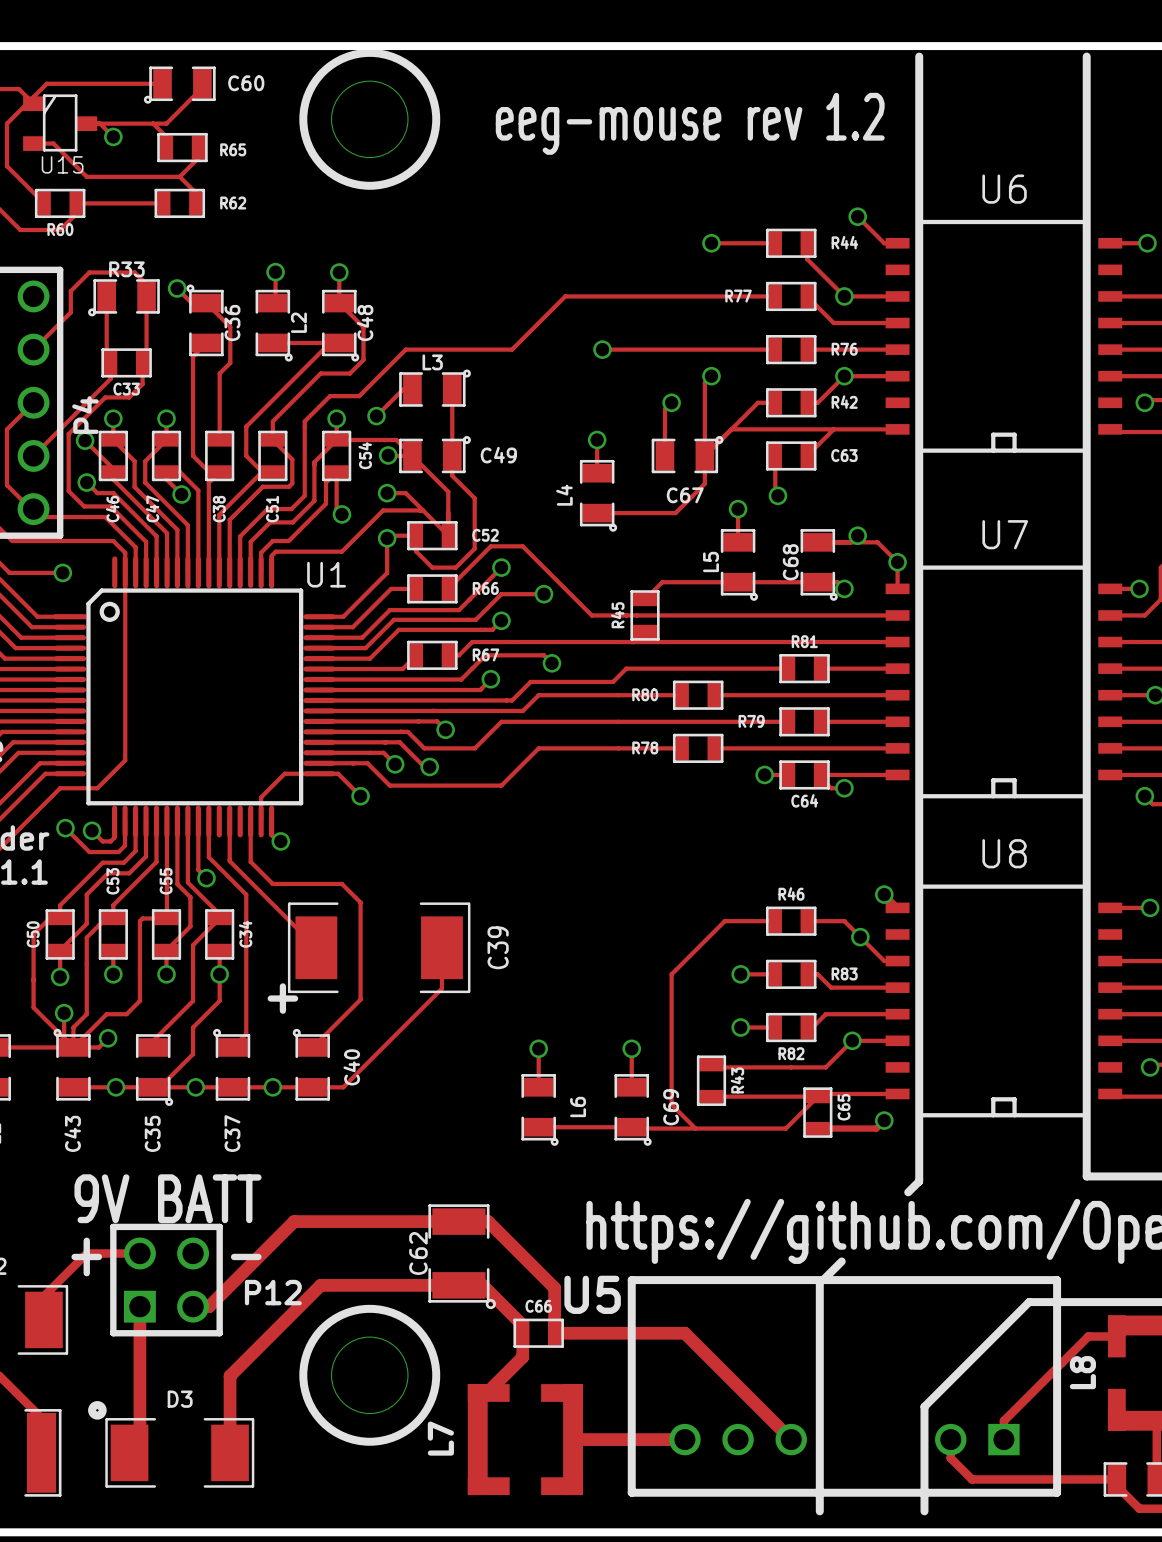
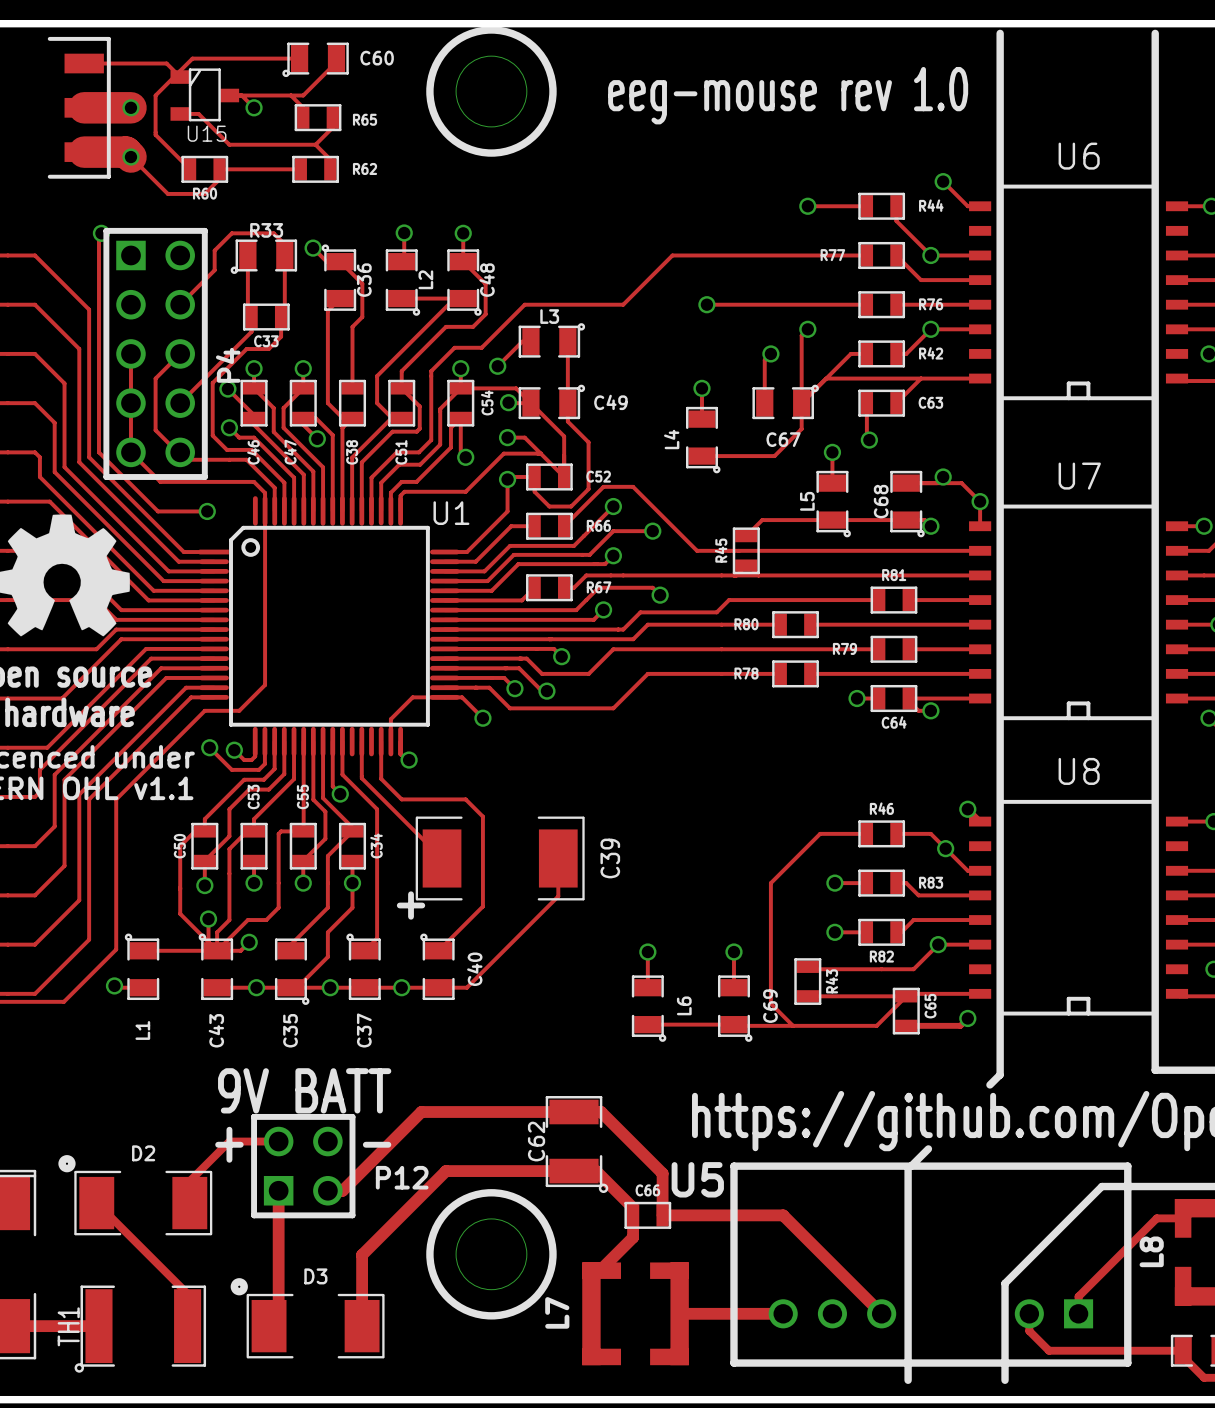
text: eeg-mouse rev 1.2 (690, 123) -> eeg-mouse rev 1.0 (788, 95)

